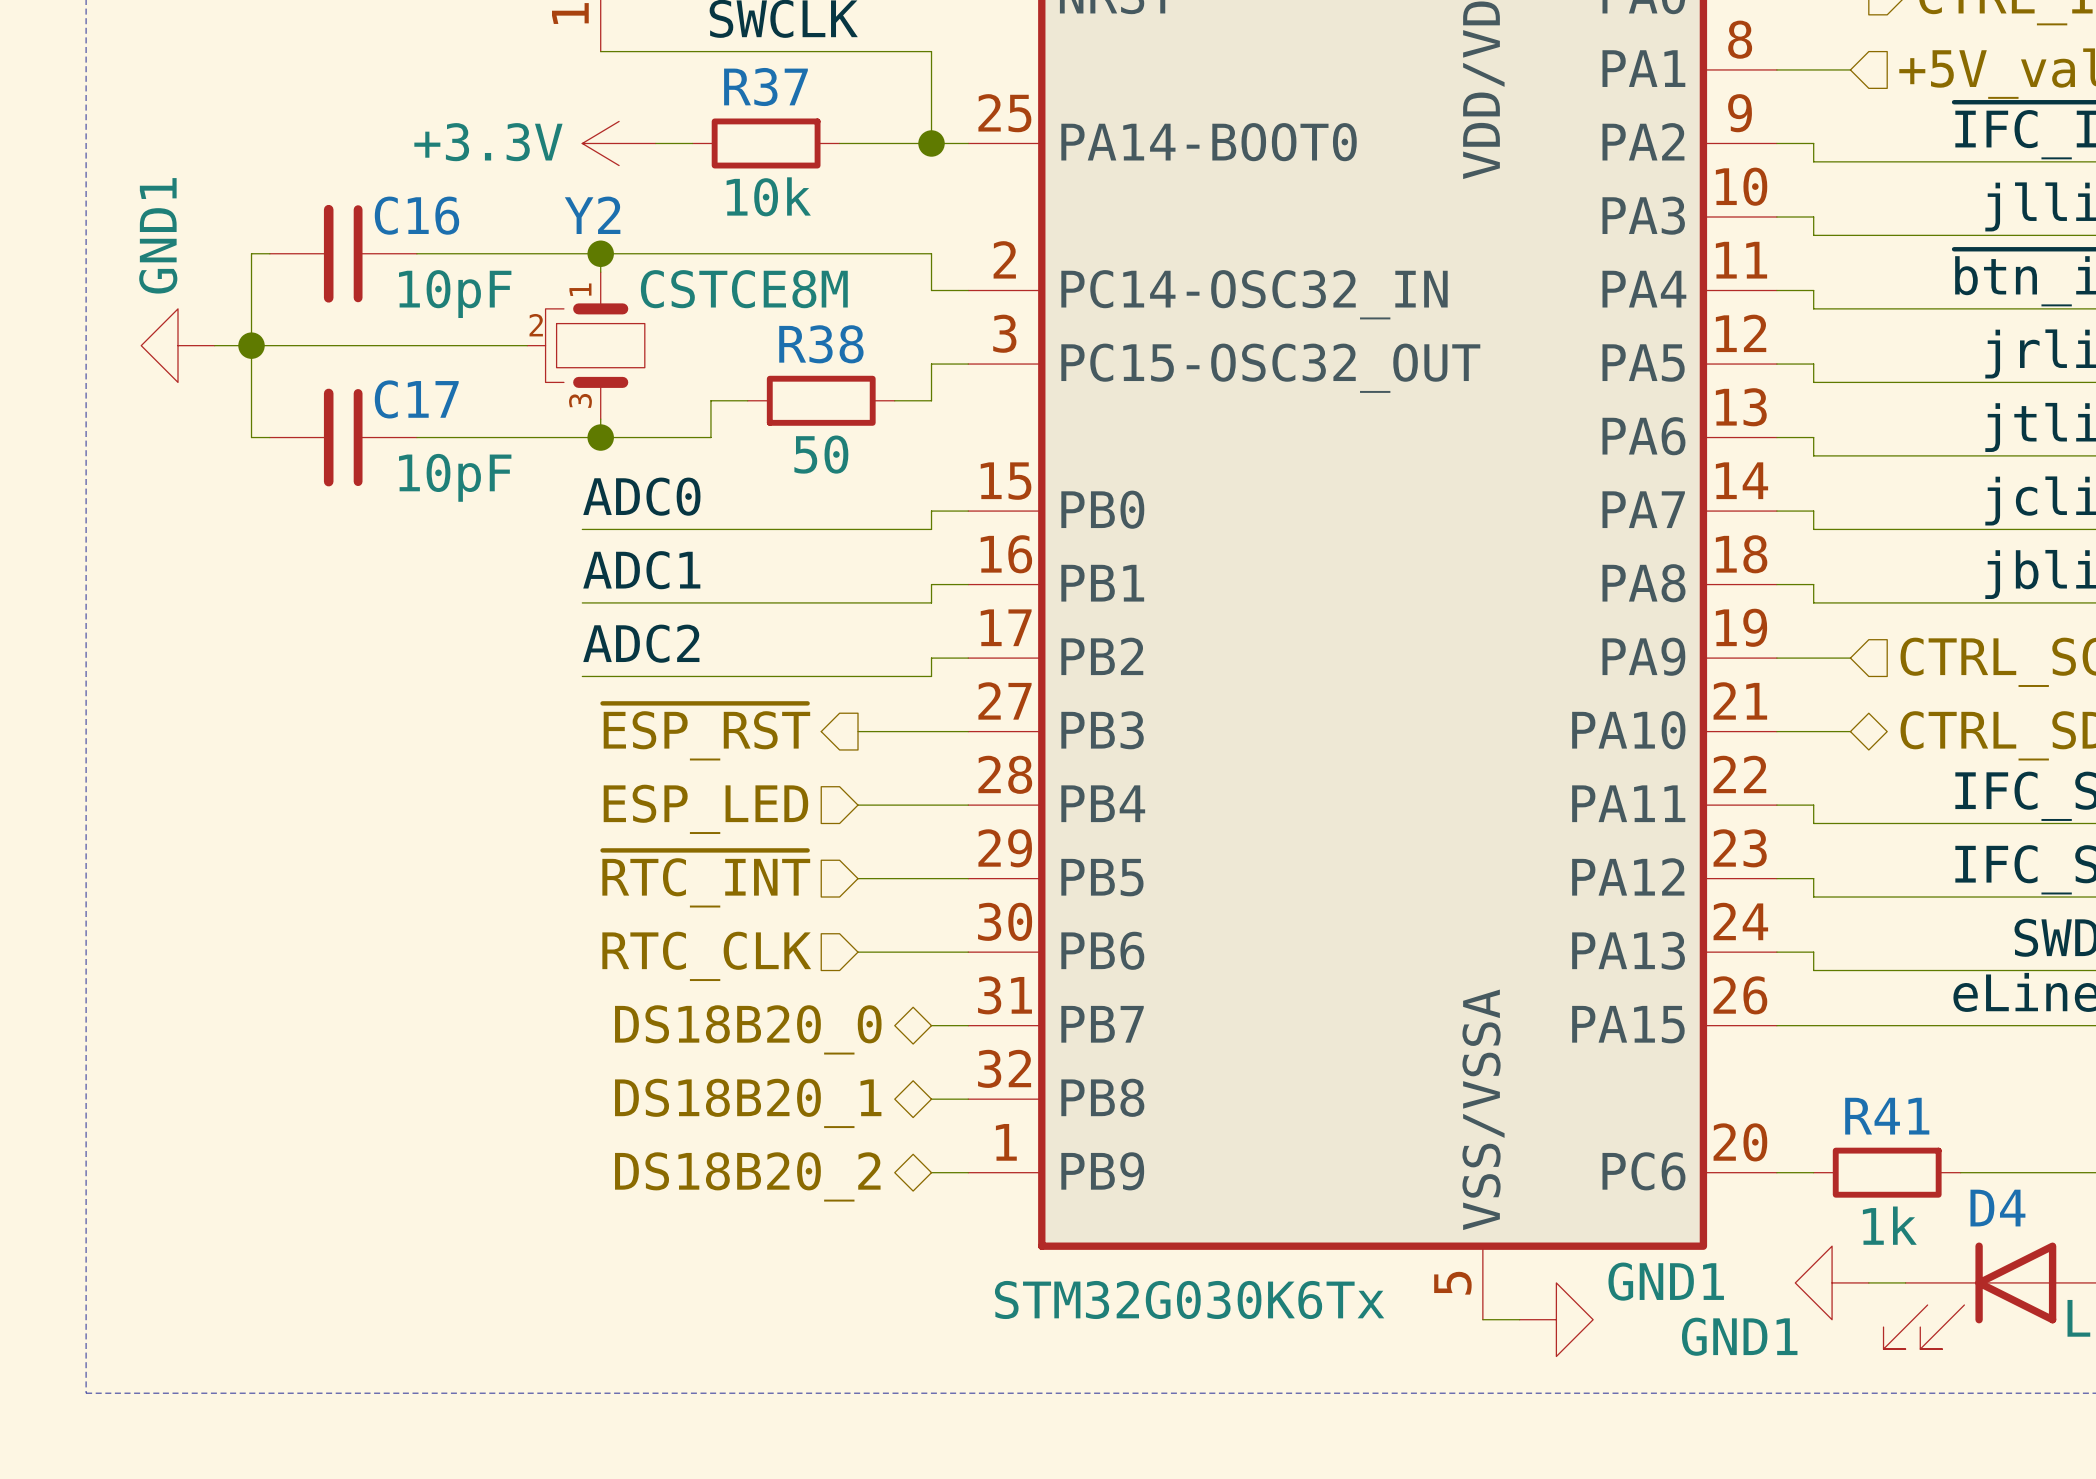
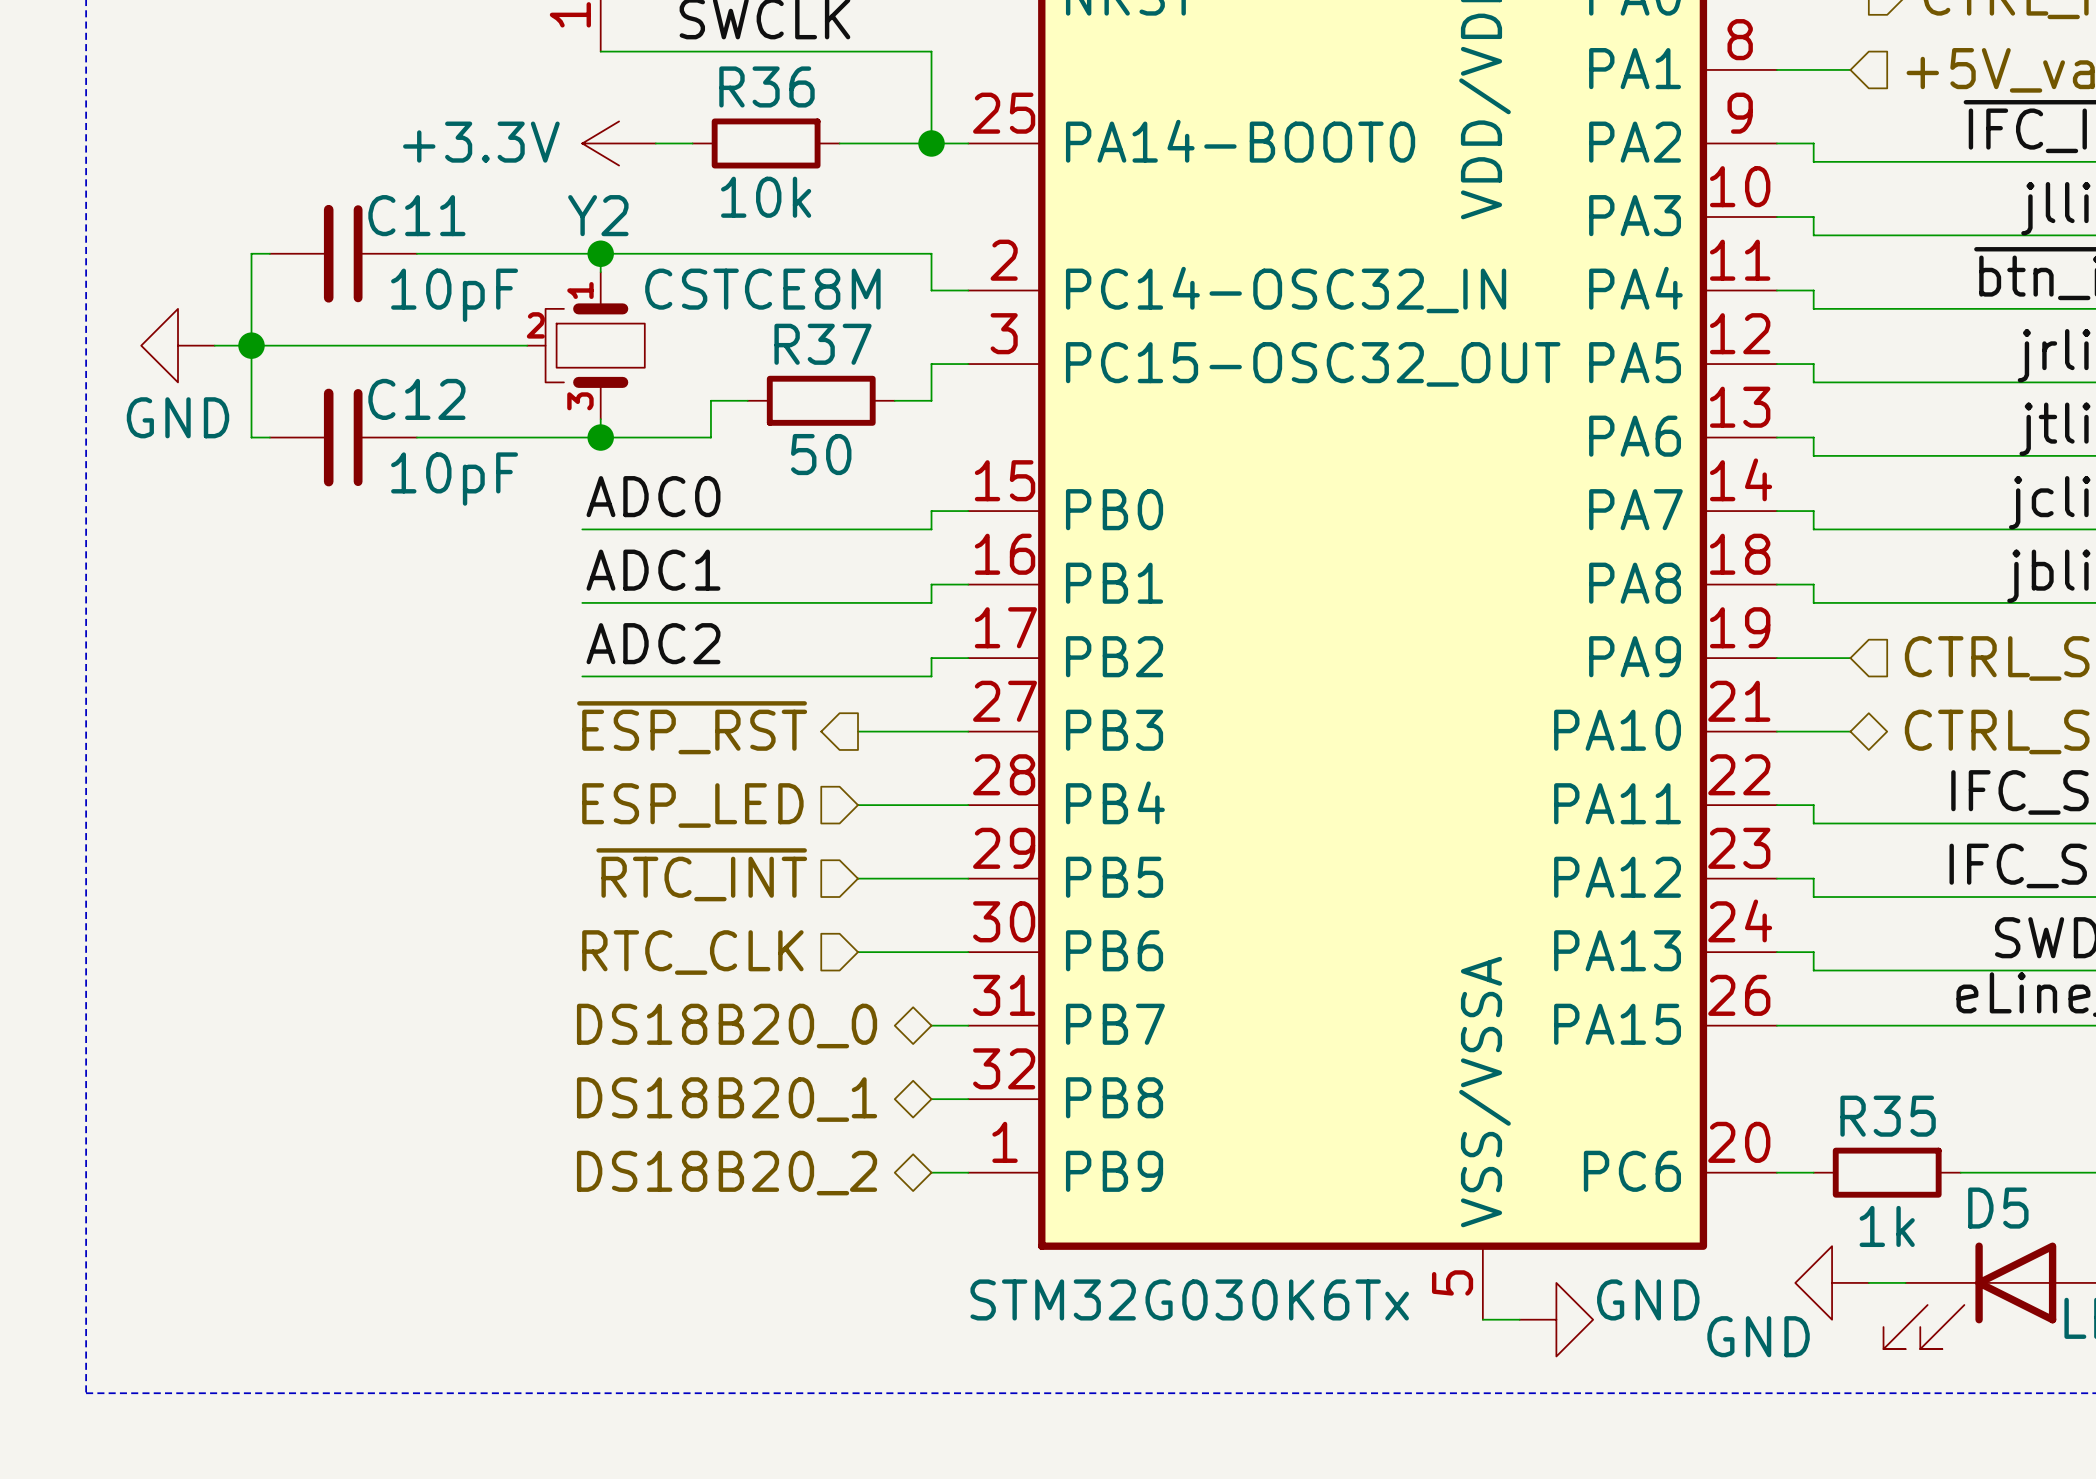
R37 name: R37 (765, 87) -> R36 (766, 86)
C16 name: C16 (416, 215) -> C11 (416, 215)
R38 name: R38 (821, 344) -> R37 (822, 344)
power symbol: GND1 (178, 345) -> GND (178, 345)
C17 name: C17 (416, 399) -> C12 (416, 399)
R41 name: R41 (1887, 1116) -> R35 (1888, 1116)
D4 name: D4 (1997, 1208) -> D5 (1998, 1208)
power symbol: GND1 (1832, 1282) -> GND (1832, 1282)
power symbol: GND1 (1556, 1319) -> GND (1556, 1319)

